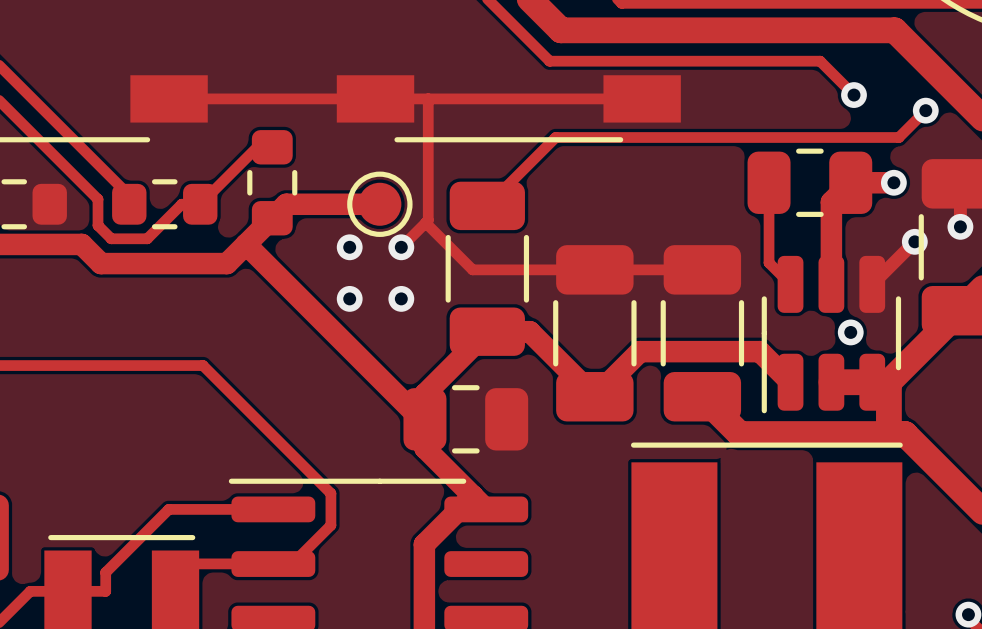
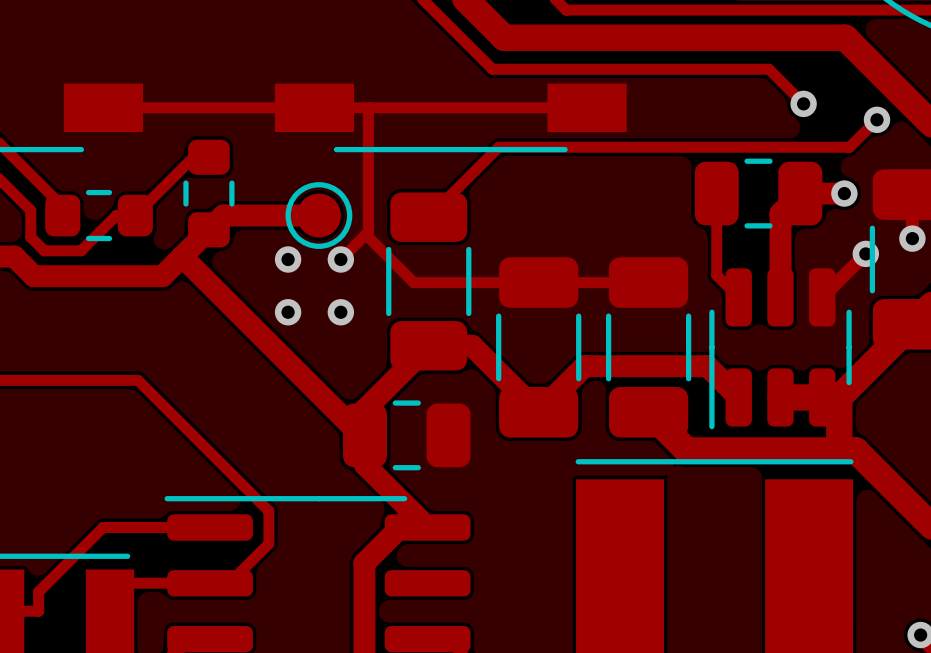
via: (850, 332) -> none

